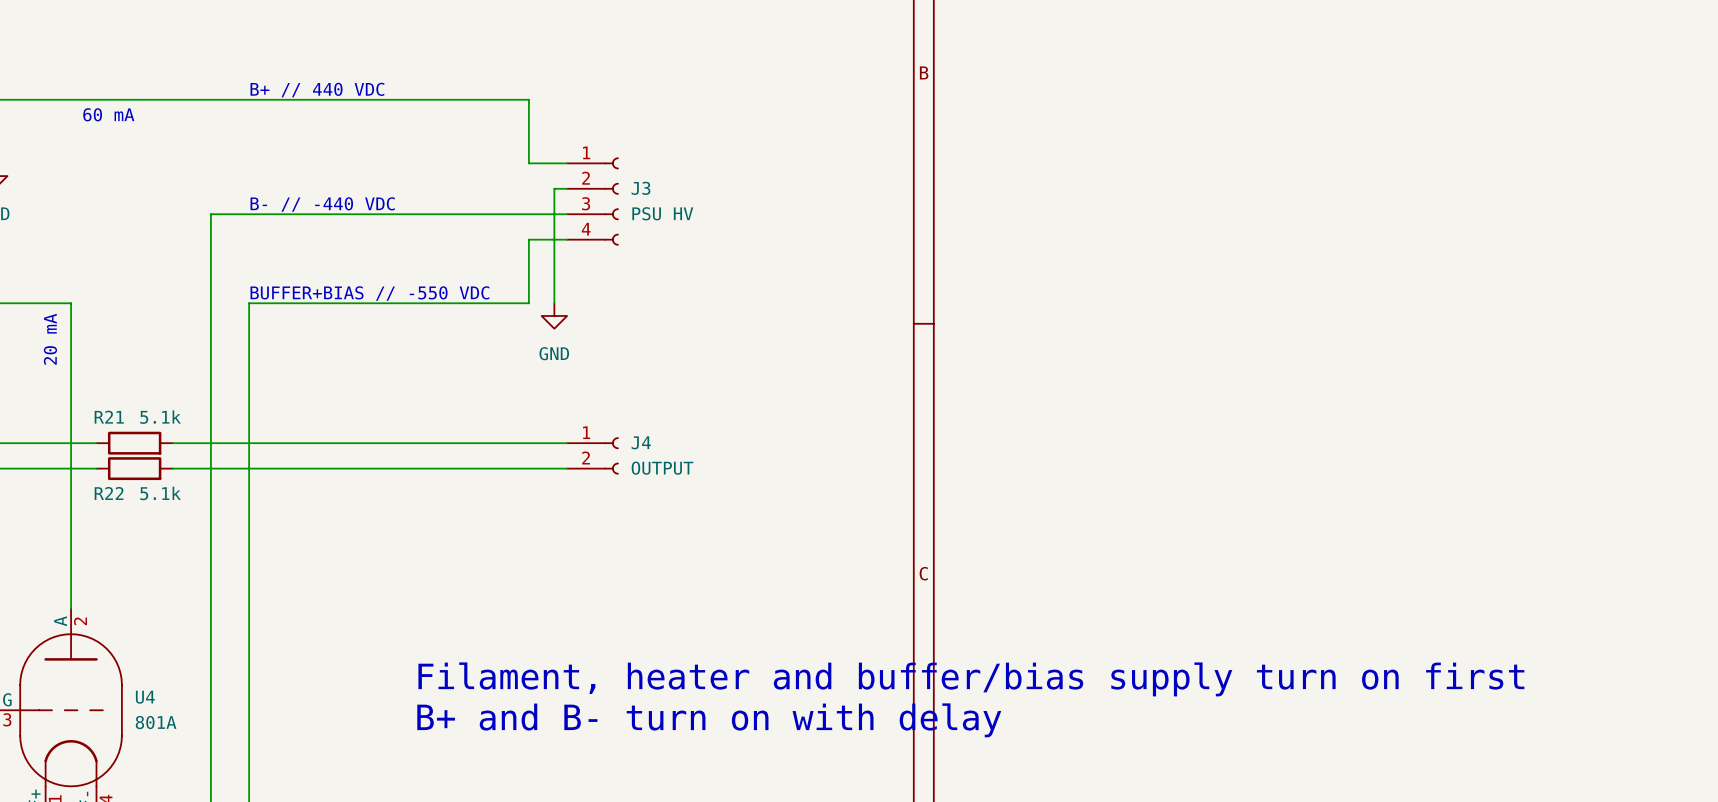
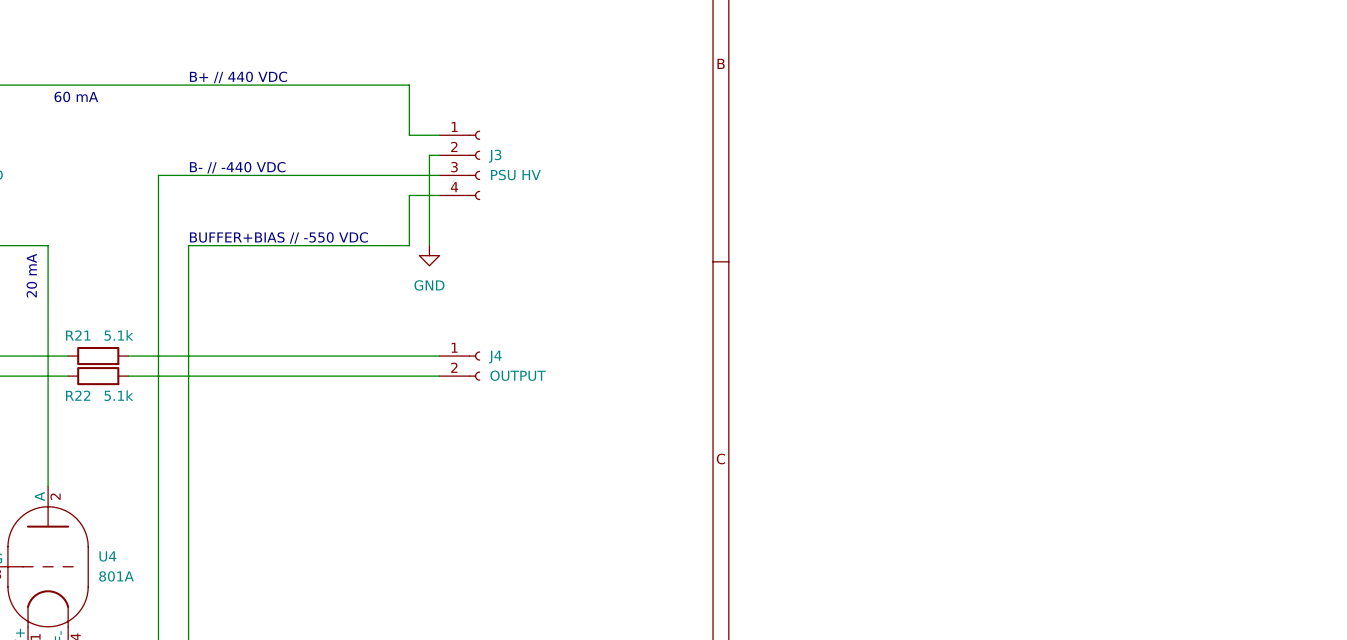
text: Filament, heater and buffer/bias supply turn on first (971, 679) -> none
text: B+ and B- turn on with delay (709, 720) -> none

